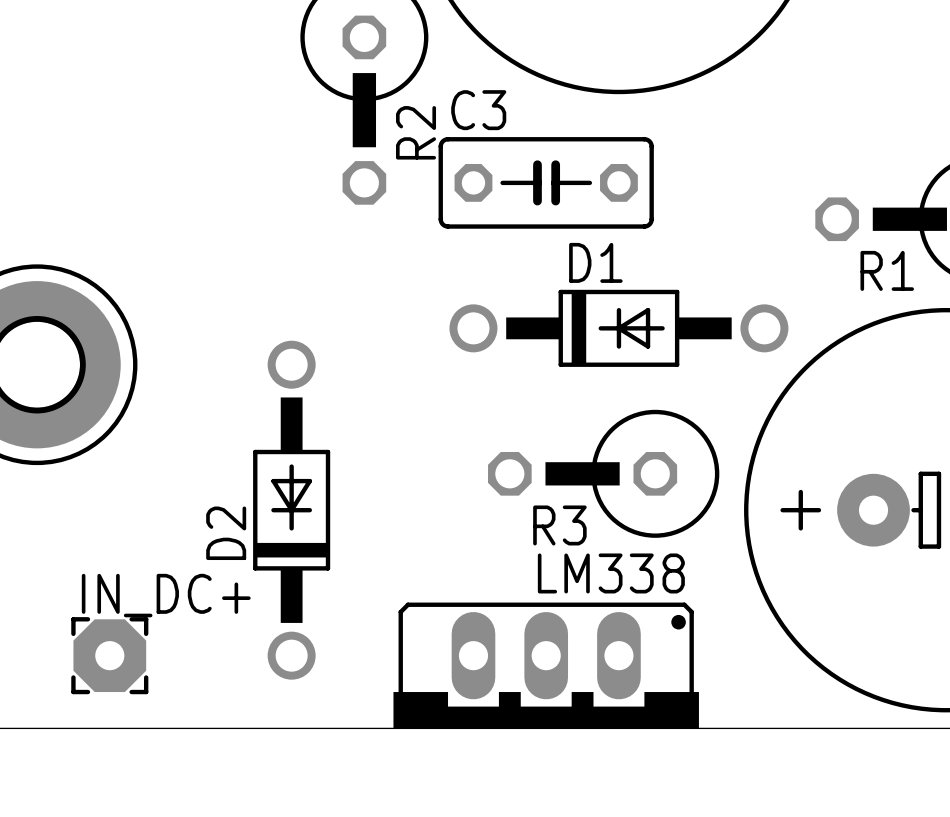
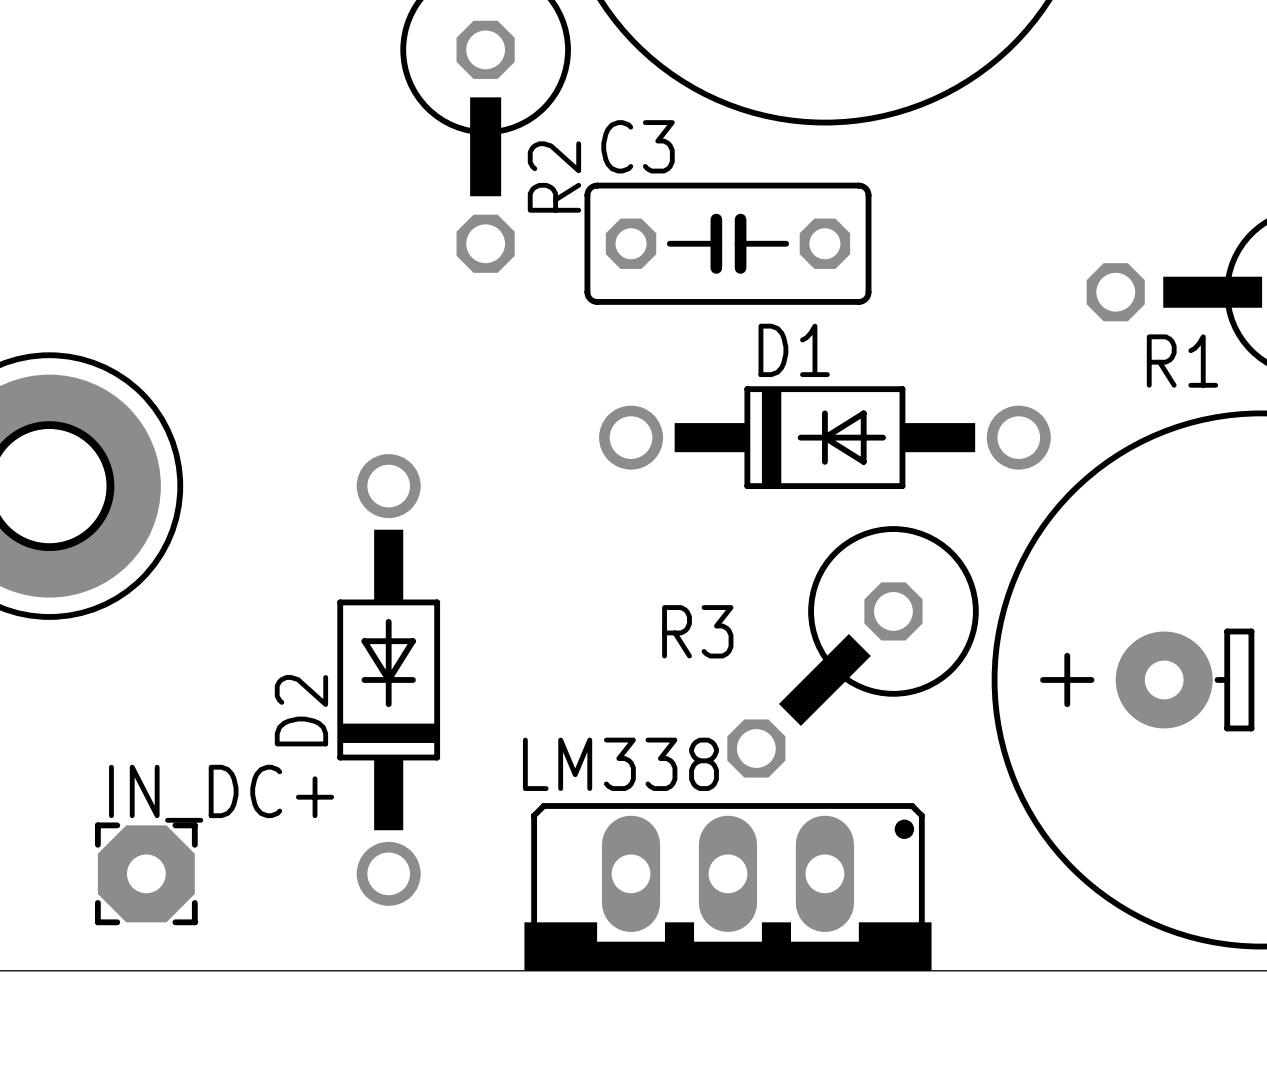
R3 rotation: 0° (603, 473) -> 45° counterclockwise (853, 651)
R3 name position: R3 (559, 525) -> R3 (697, 631)
LM338 name position: LM338 (611, 573) -> LM338 (620, 764)

